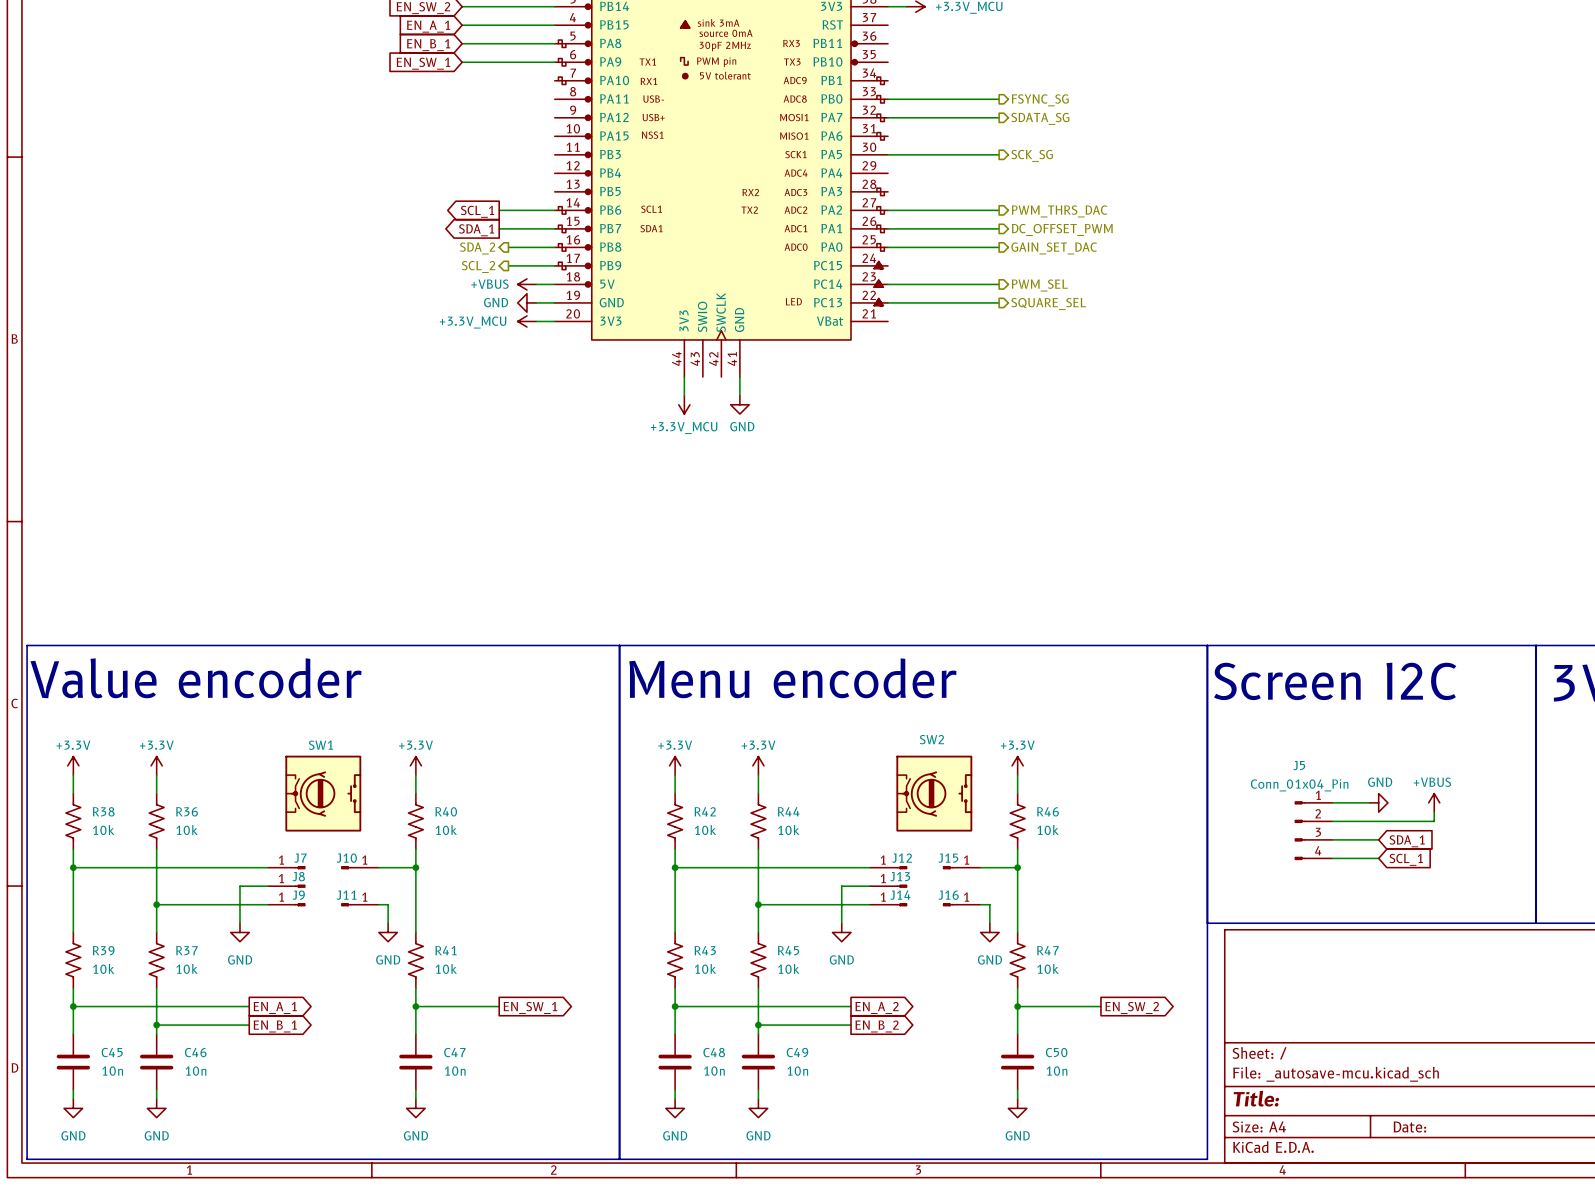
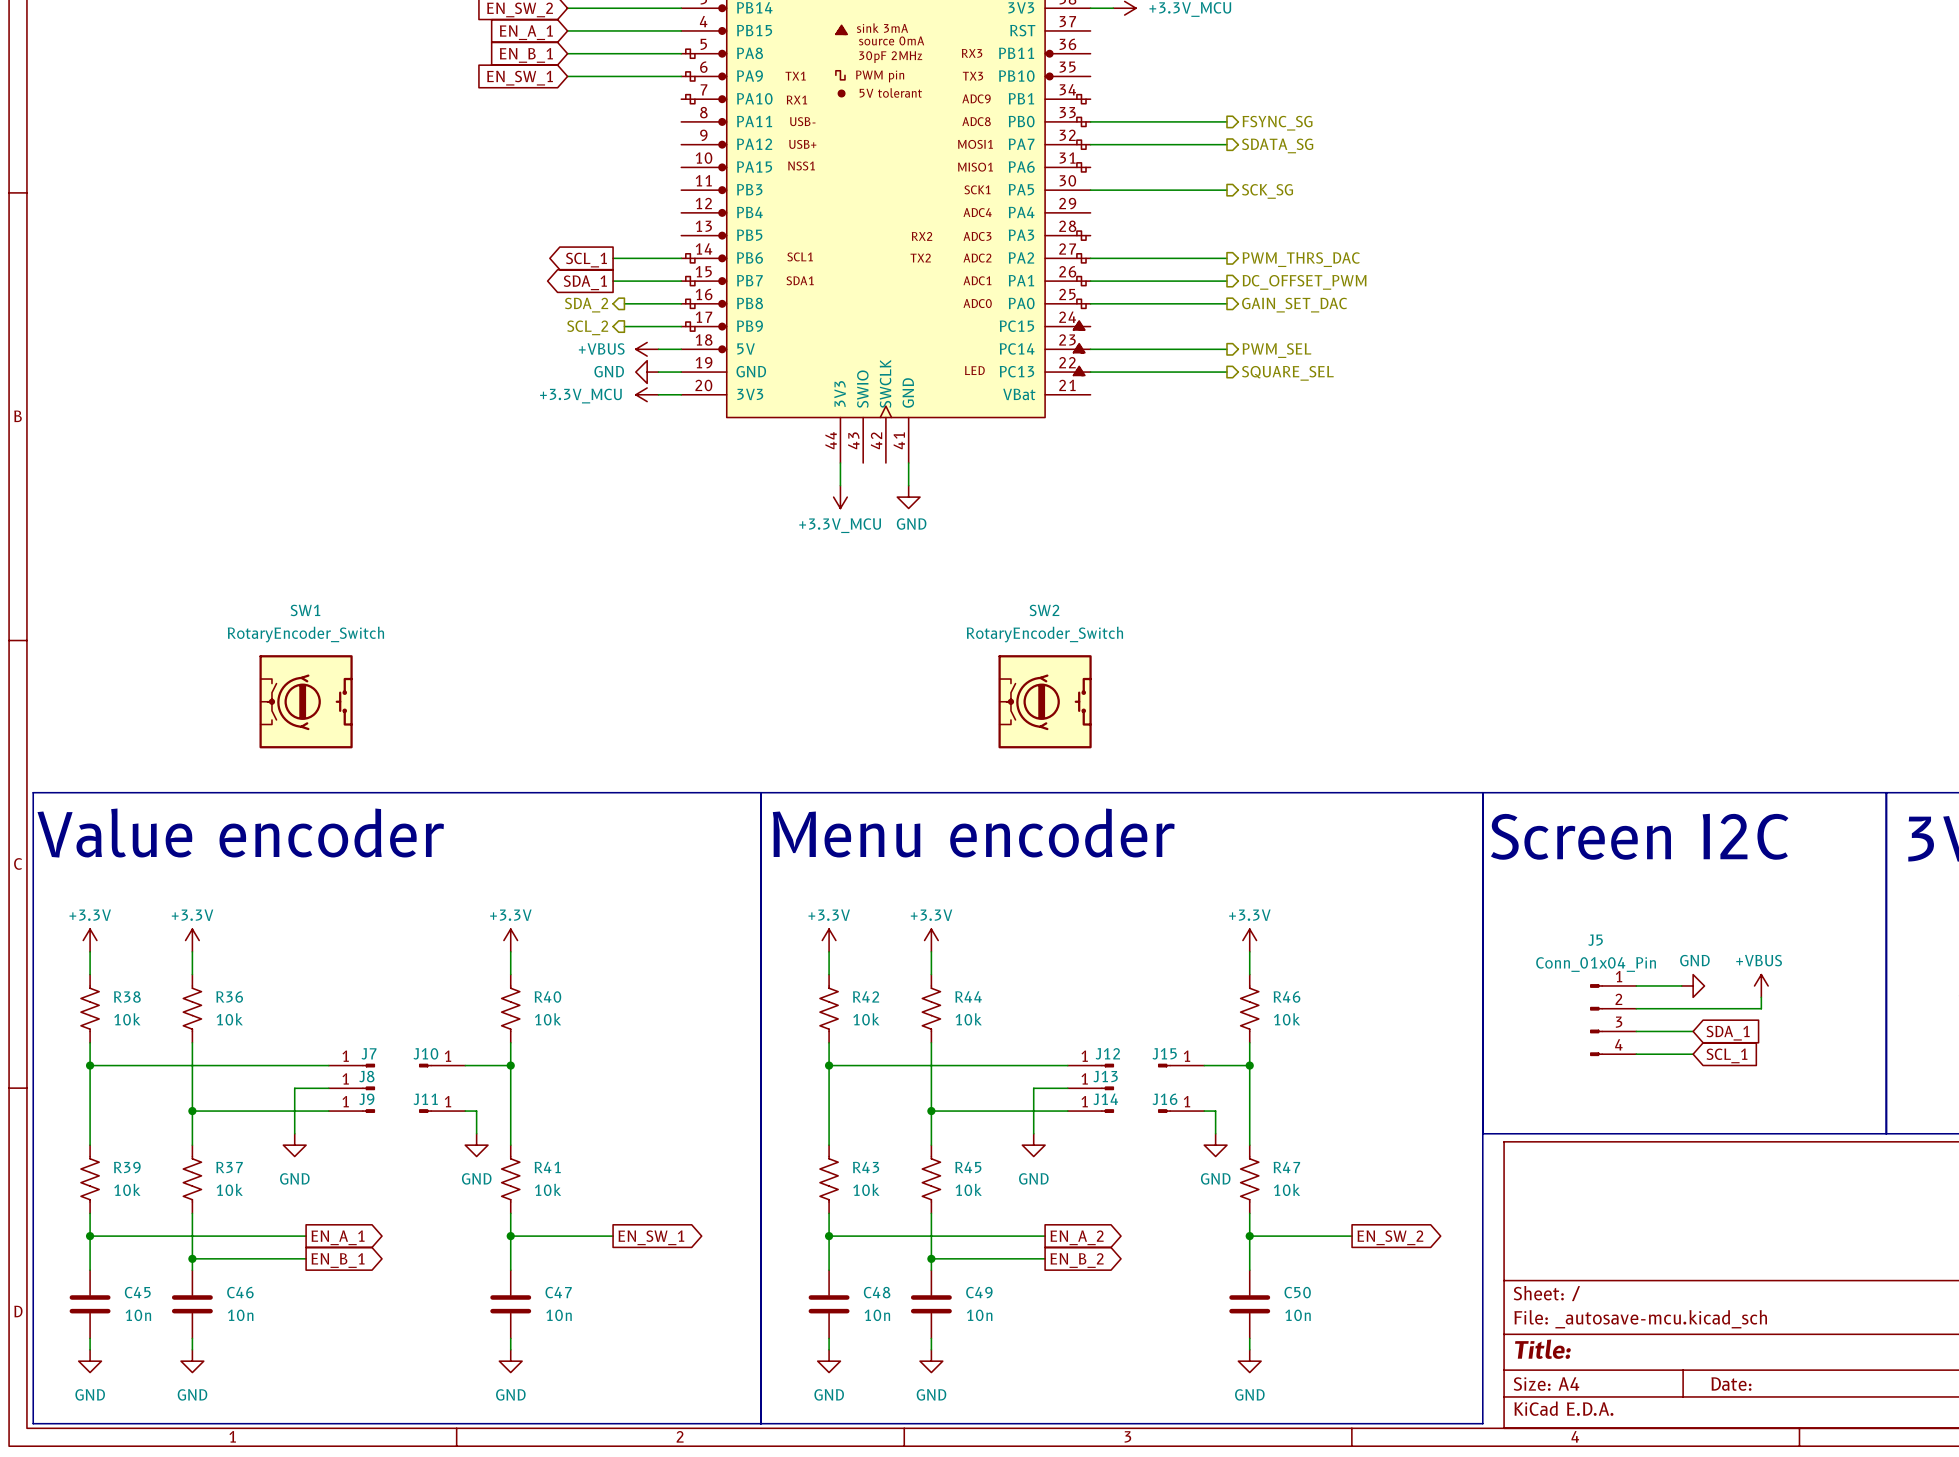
SW1 value: none -> RotaryEncoder_Switch (305, 634)
SW2 value: none -> RotaryEncoder_Switch (1044, 634)
SW2 name position: SW2 (931, 739) -> SW2 (1044, 610)
SW1 name position: SW1 (320, 745) -> SW1 (305, 610)
SW1 position: (323, 793) -> (306, 701)
SW2 position: (934, 793) -> (1045, 701)

